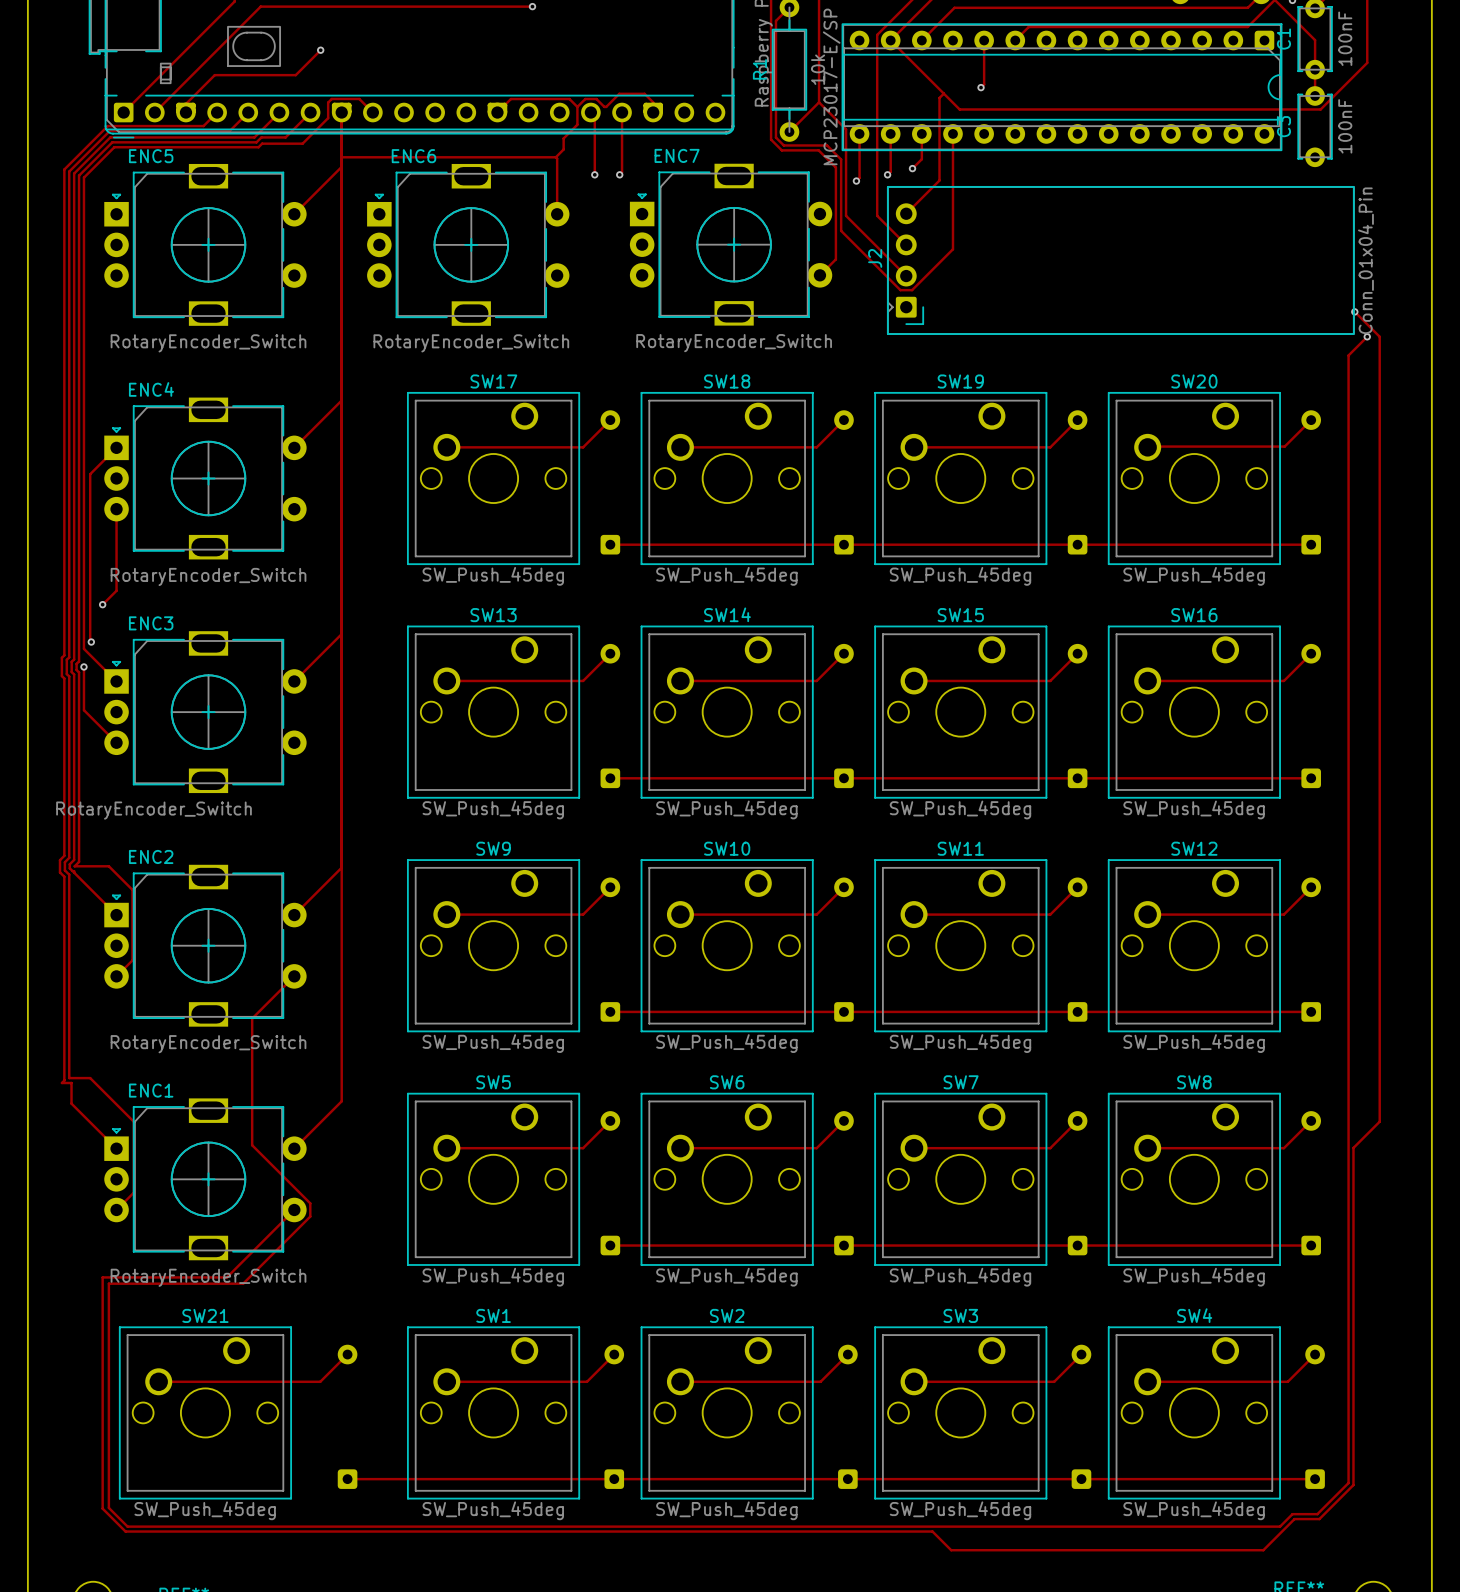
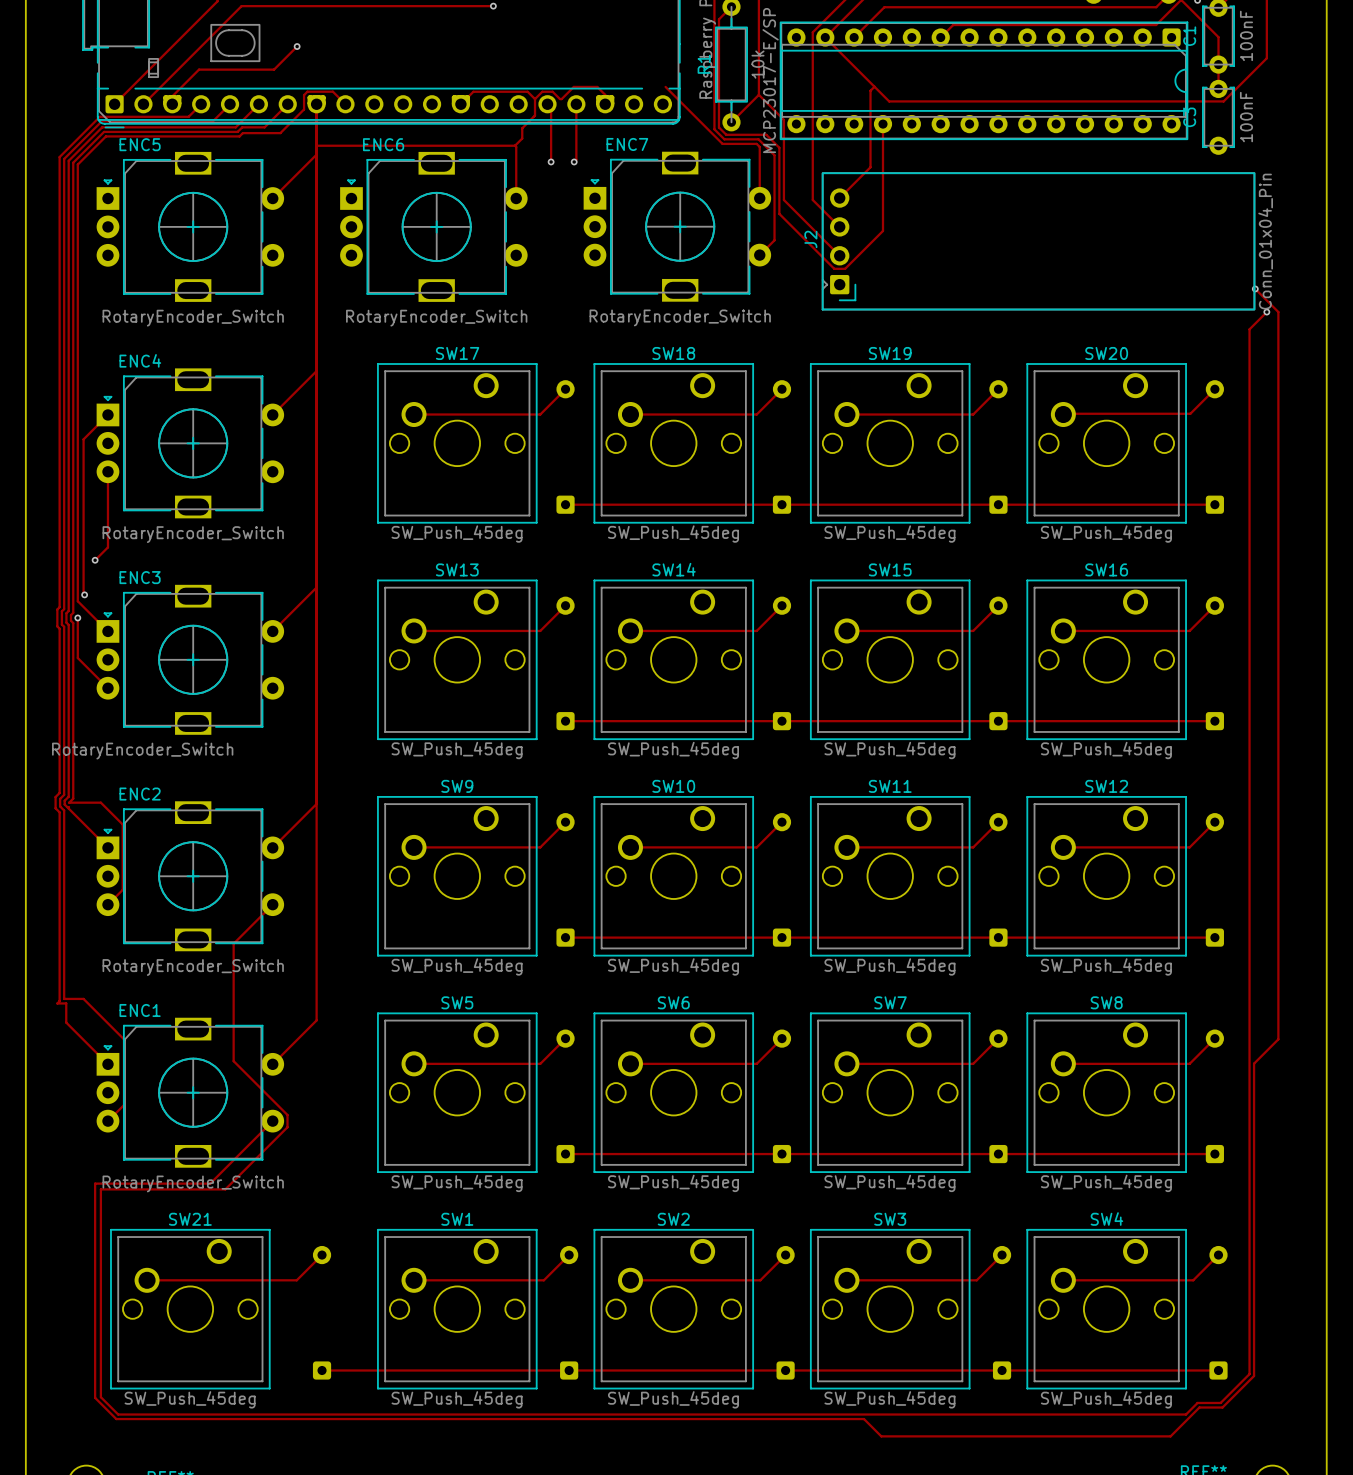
track: (984, 40) (984, 84) (981, 87) -> none
via: (981, 87) -> none
track: none -> (665, 86) (722, 143) (756, 143) (759, 146) (759, 198)
track: (859, 133) (859, 177) (856, 181) -> none
track: (890, 133) (890, 171) (887, 174) -> none
track: (921, 133) (921, 159) (912, 168) -> none
via: (912, 168) -> none
via: (887, 174) -> none
via: (856, 181) -> none

